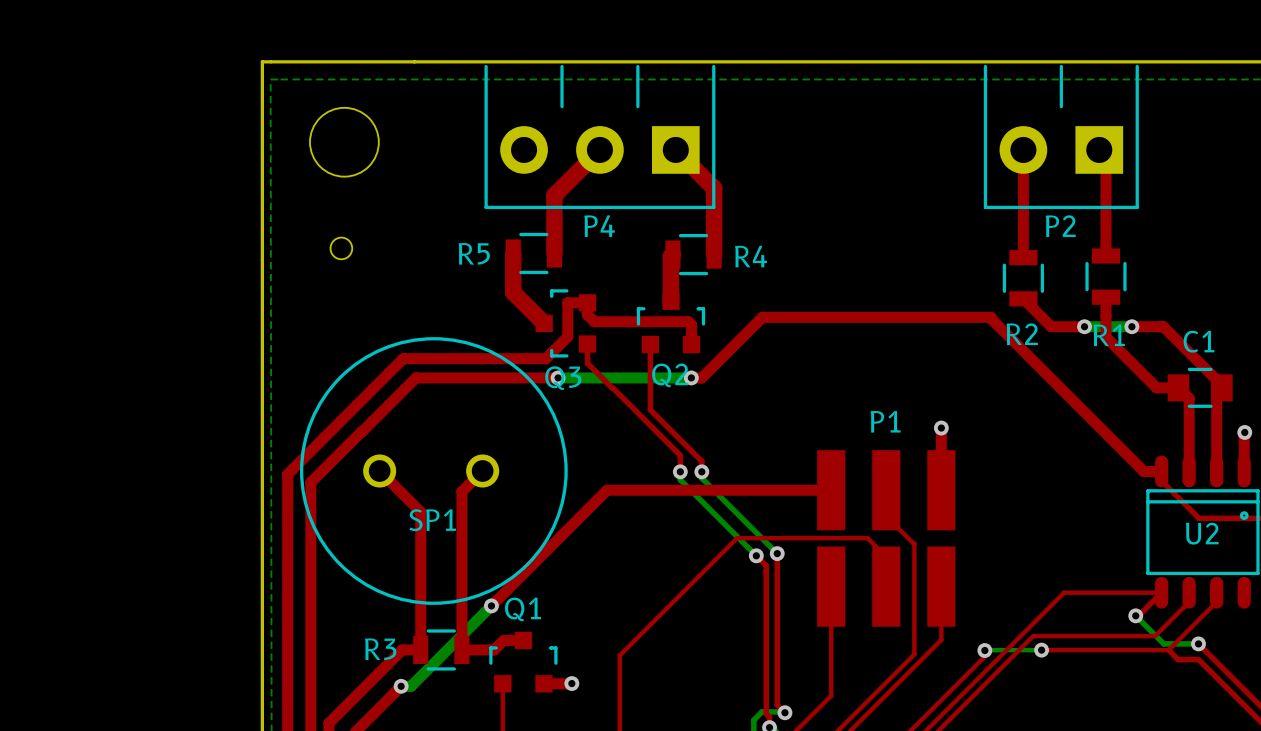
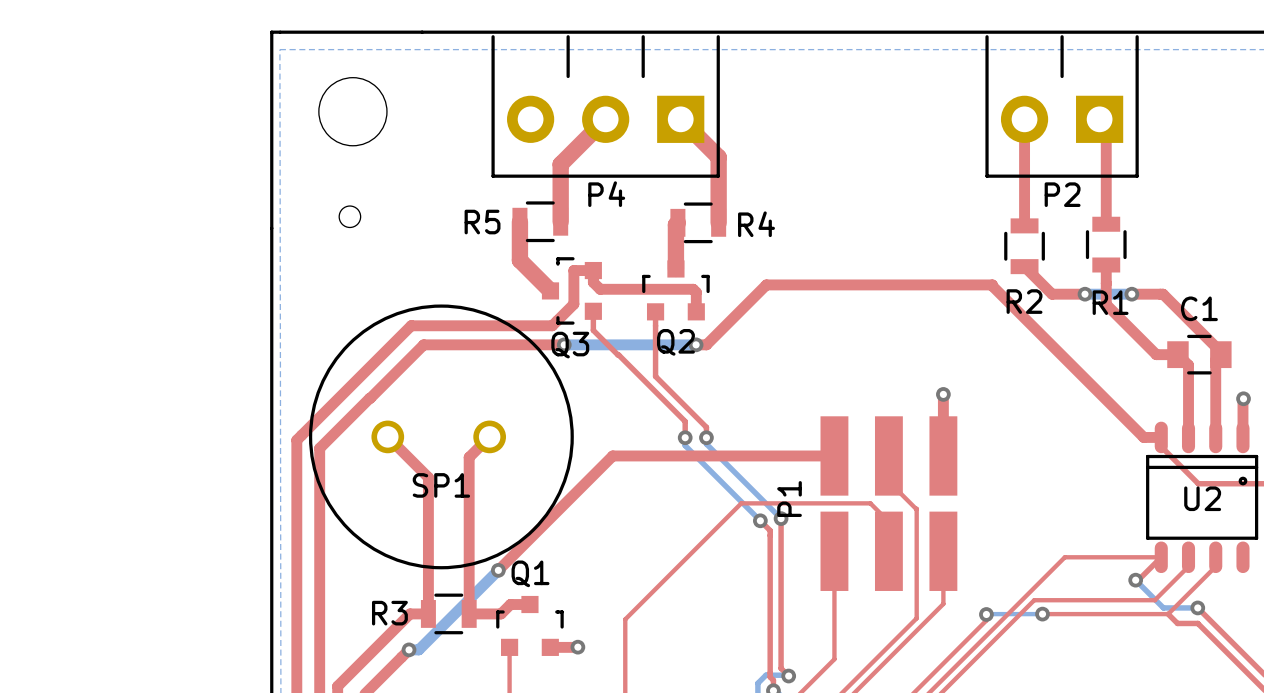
P1 name rotation: 0° (885, 421) -> 90° counterclockwise (789, 499)
P1 name position: P1 (885, 421) -> P1 (789, 499)

